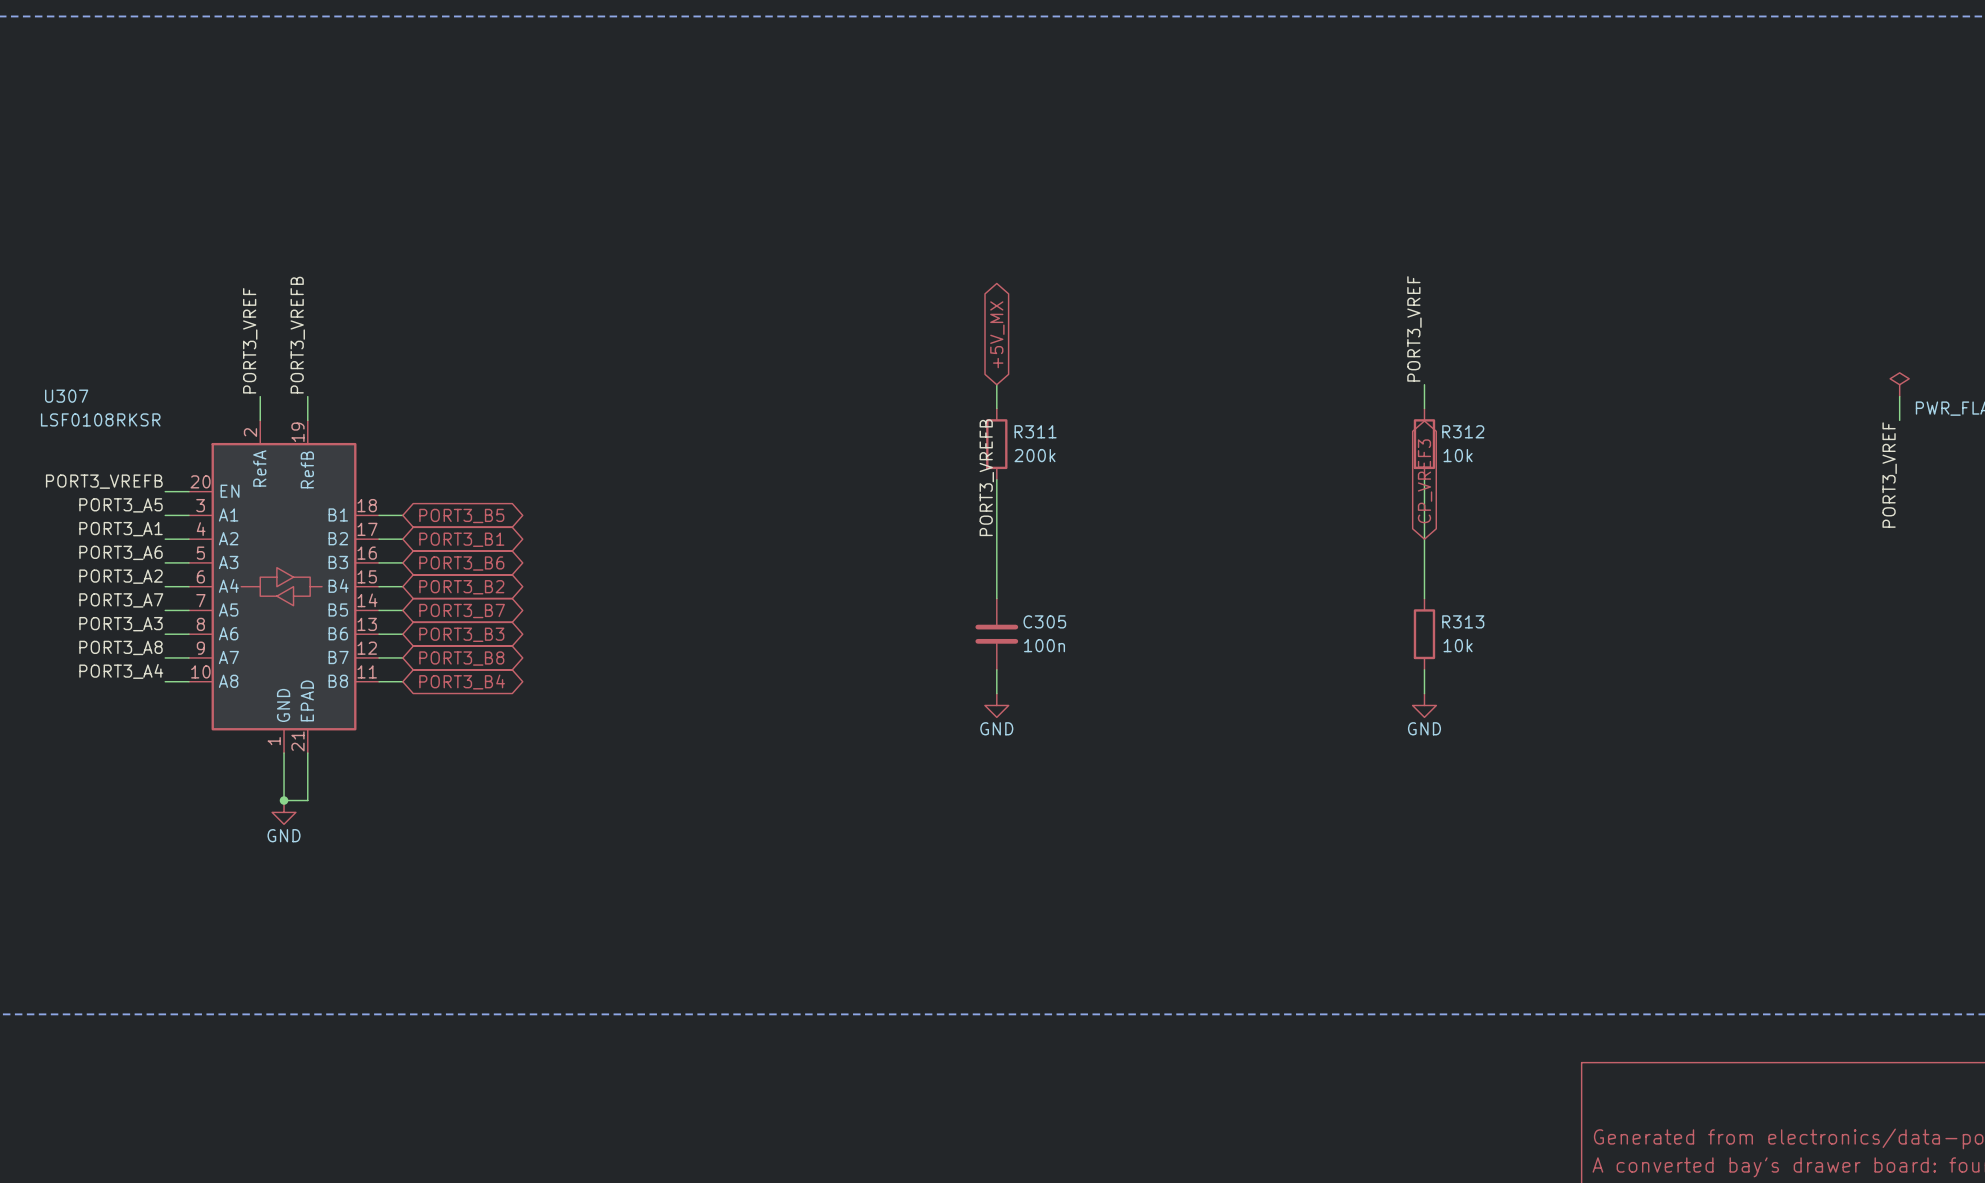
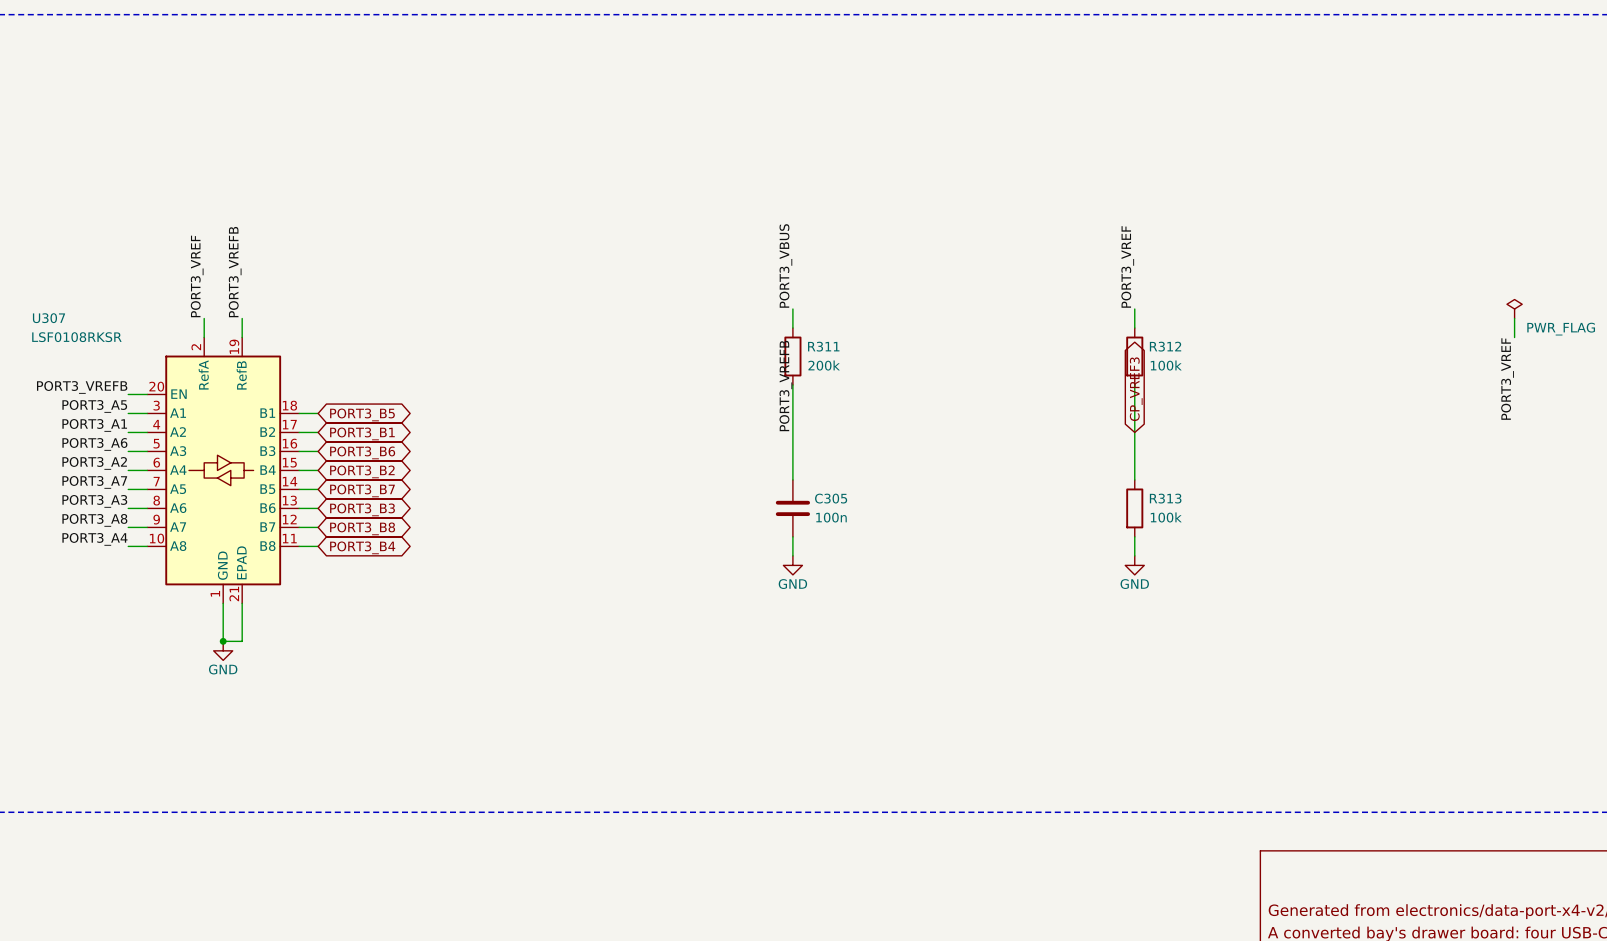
label: none -> PORT3_VBUS (785, 265)
global label: +5V_MX (997, 334) -> none
R312 value: 10k (1458, 455) -> 100k (1166, 365)
R313 value: 10k (1458, 645) -> 100k (1166, 517)

